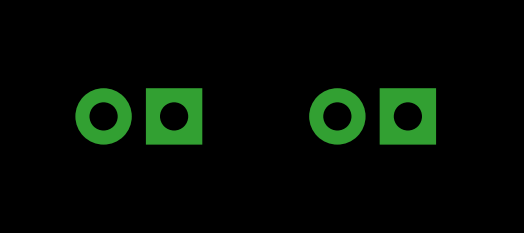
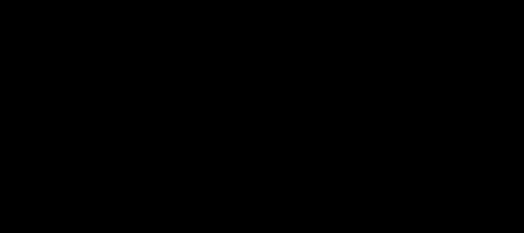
part: (138, 116) -> none
part: (372, 116) -> none

